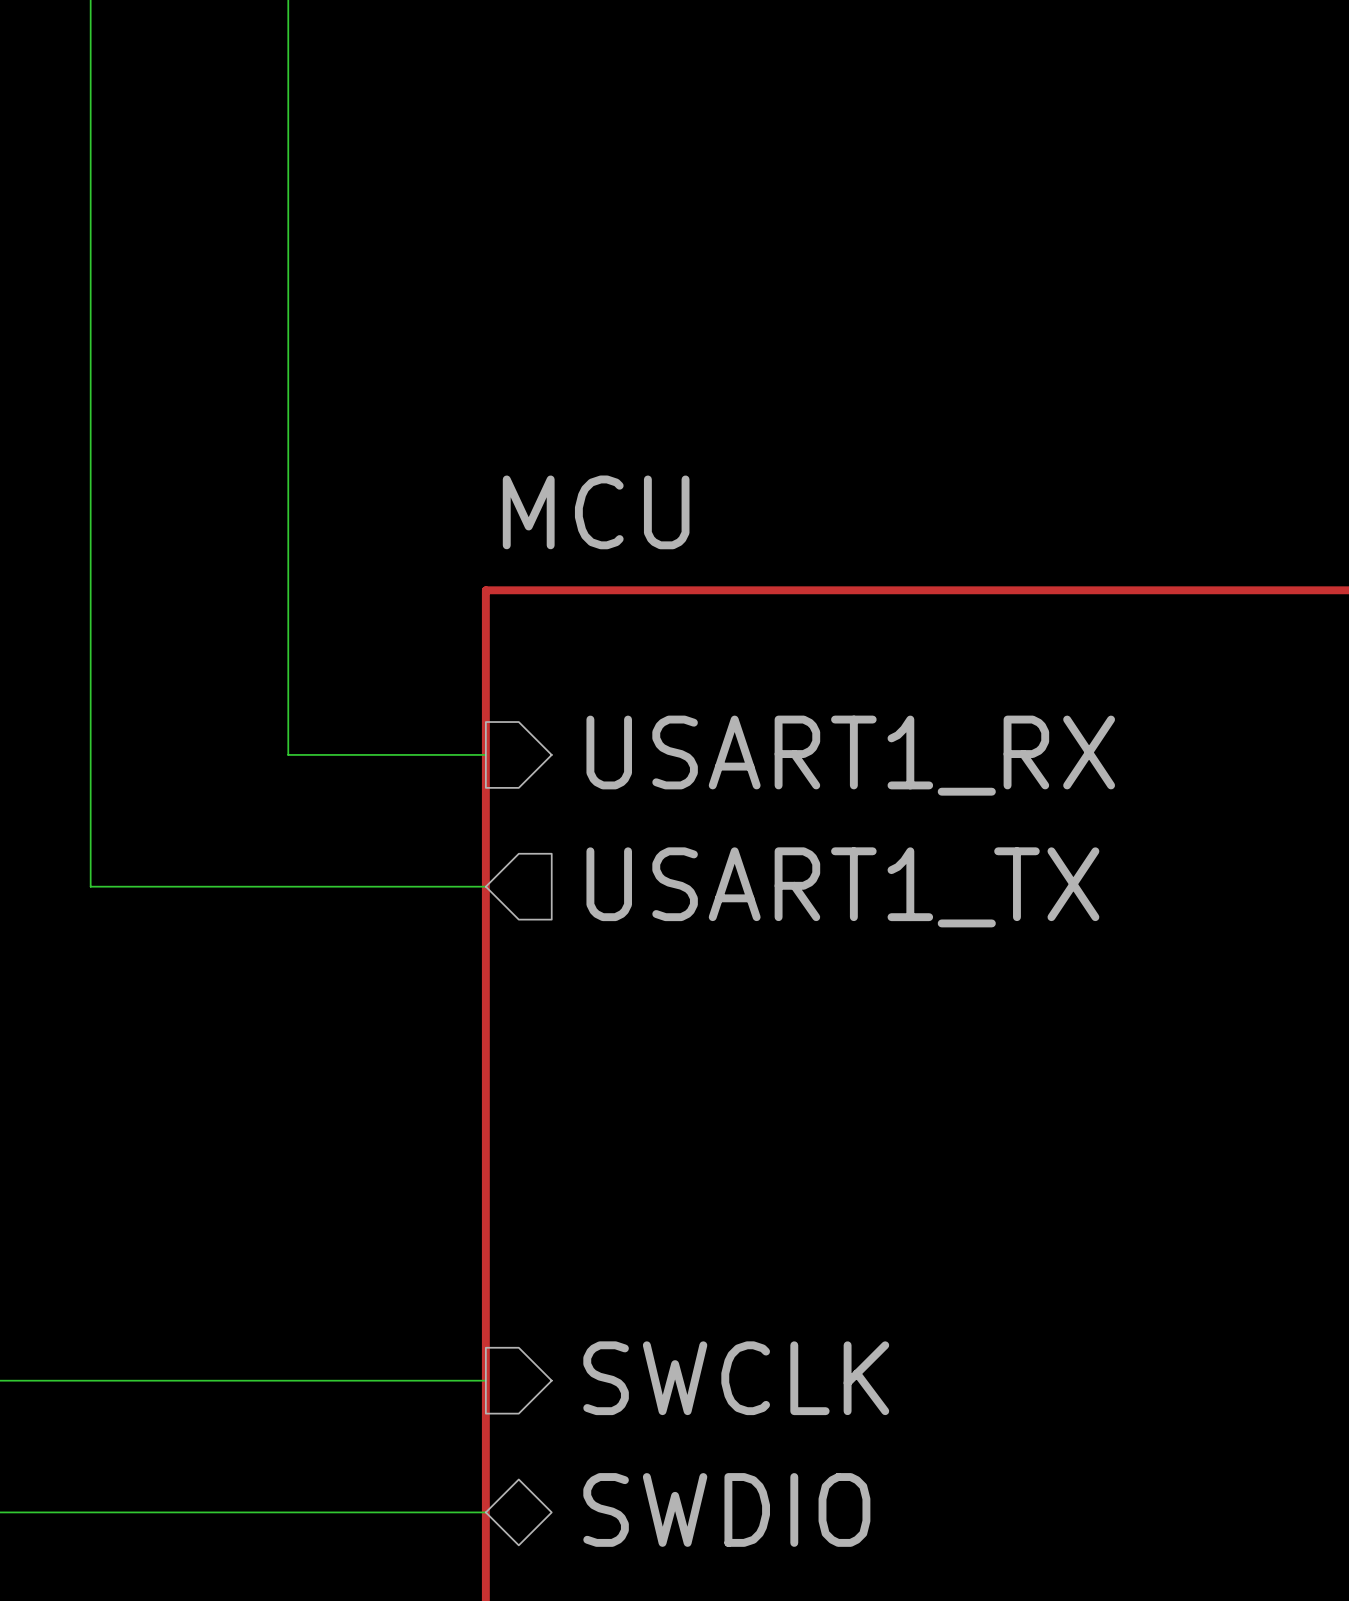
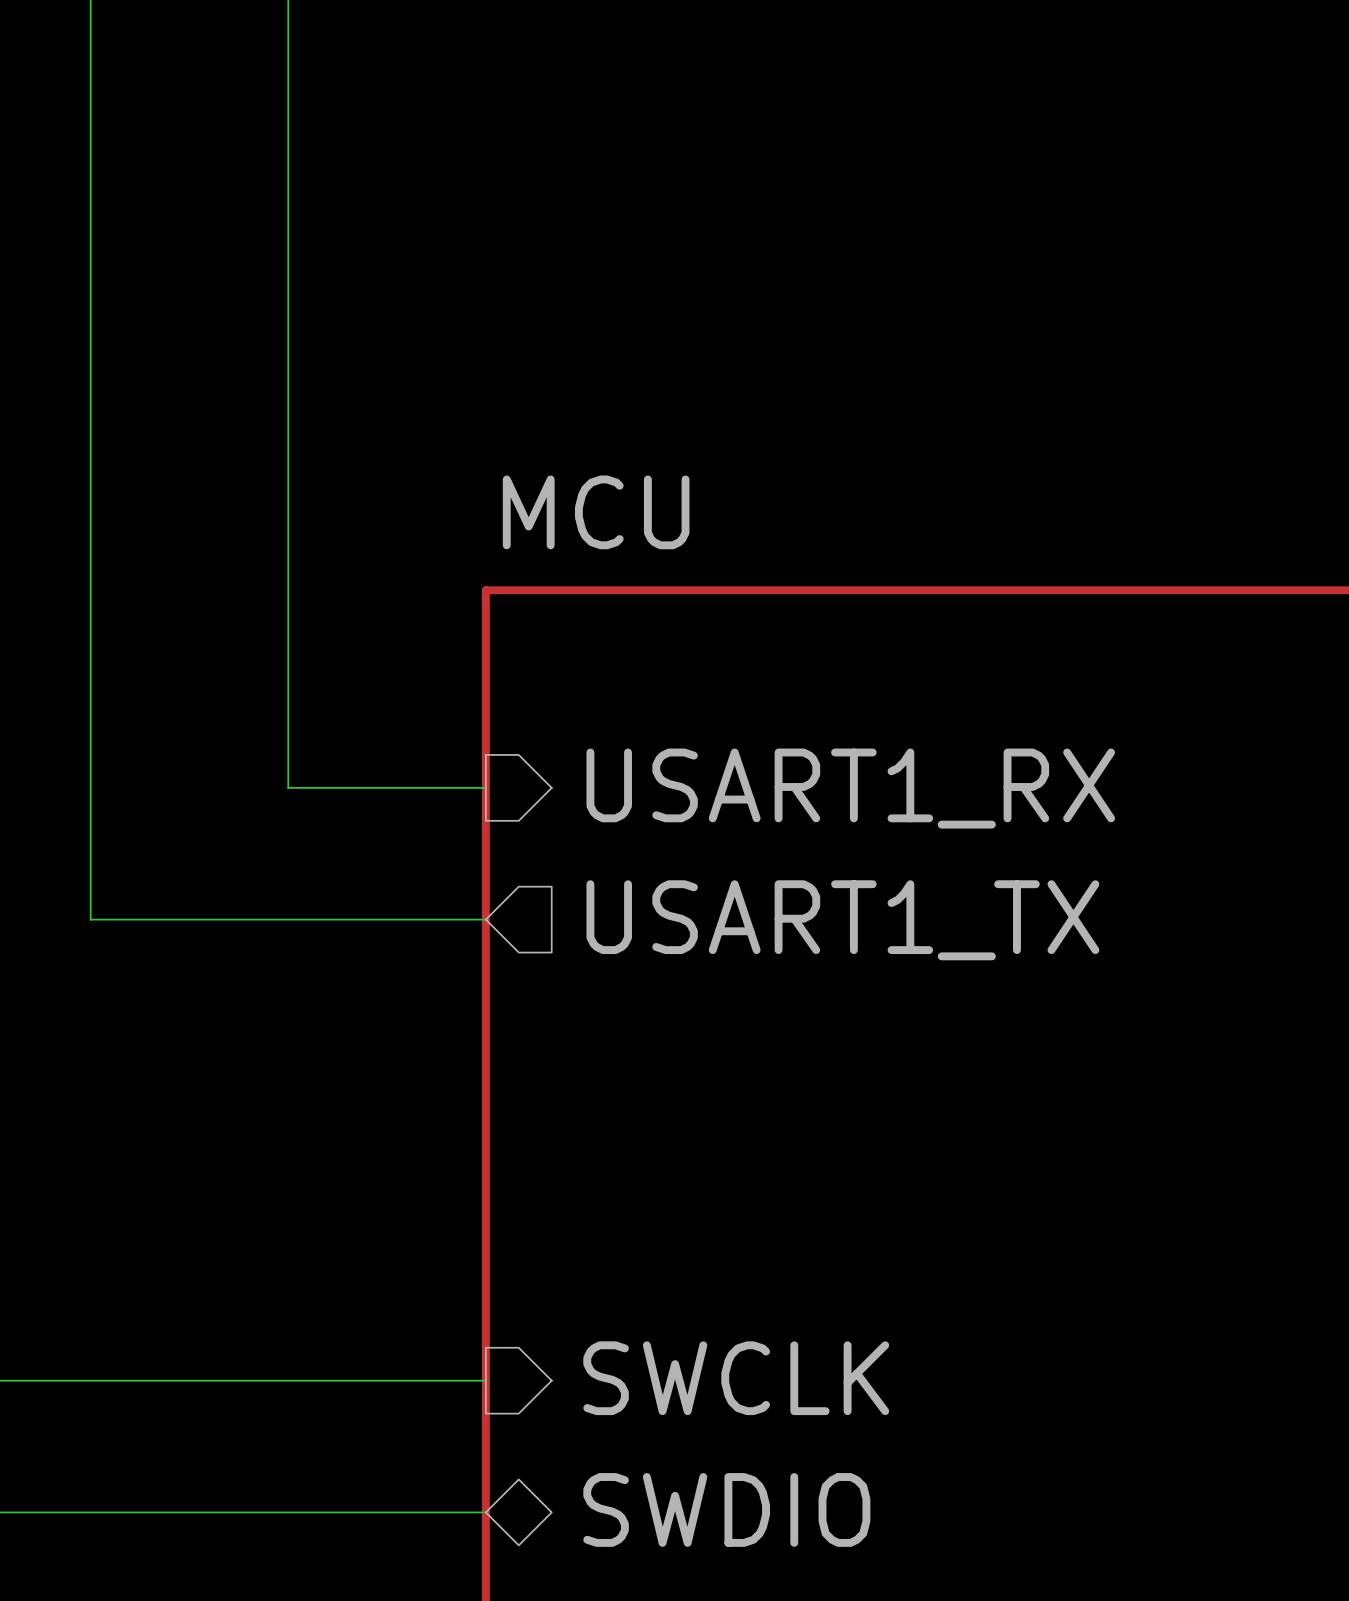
wire: (288, 754) (485, 754) -> (288, 754) (288, 787) (485, 787)
sheet pin position: USART1_RX (850, 755) -> USART1_RX (850, 788)
wire: (90, 886) (485, 886) -> (90, 886) (90, 919) (485, 919)
sheet pin position: USART1_TX (842, 887) -> USART1_TX (842, 920)

